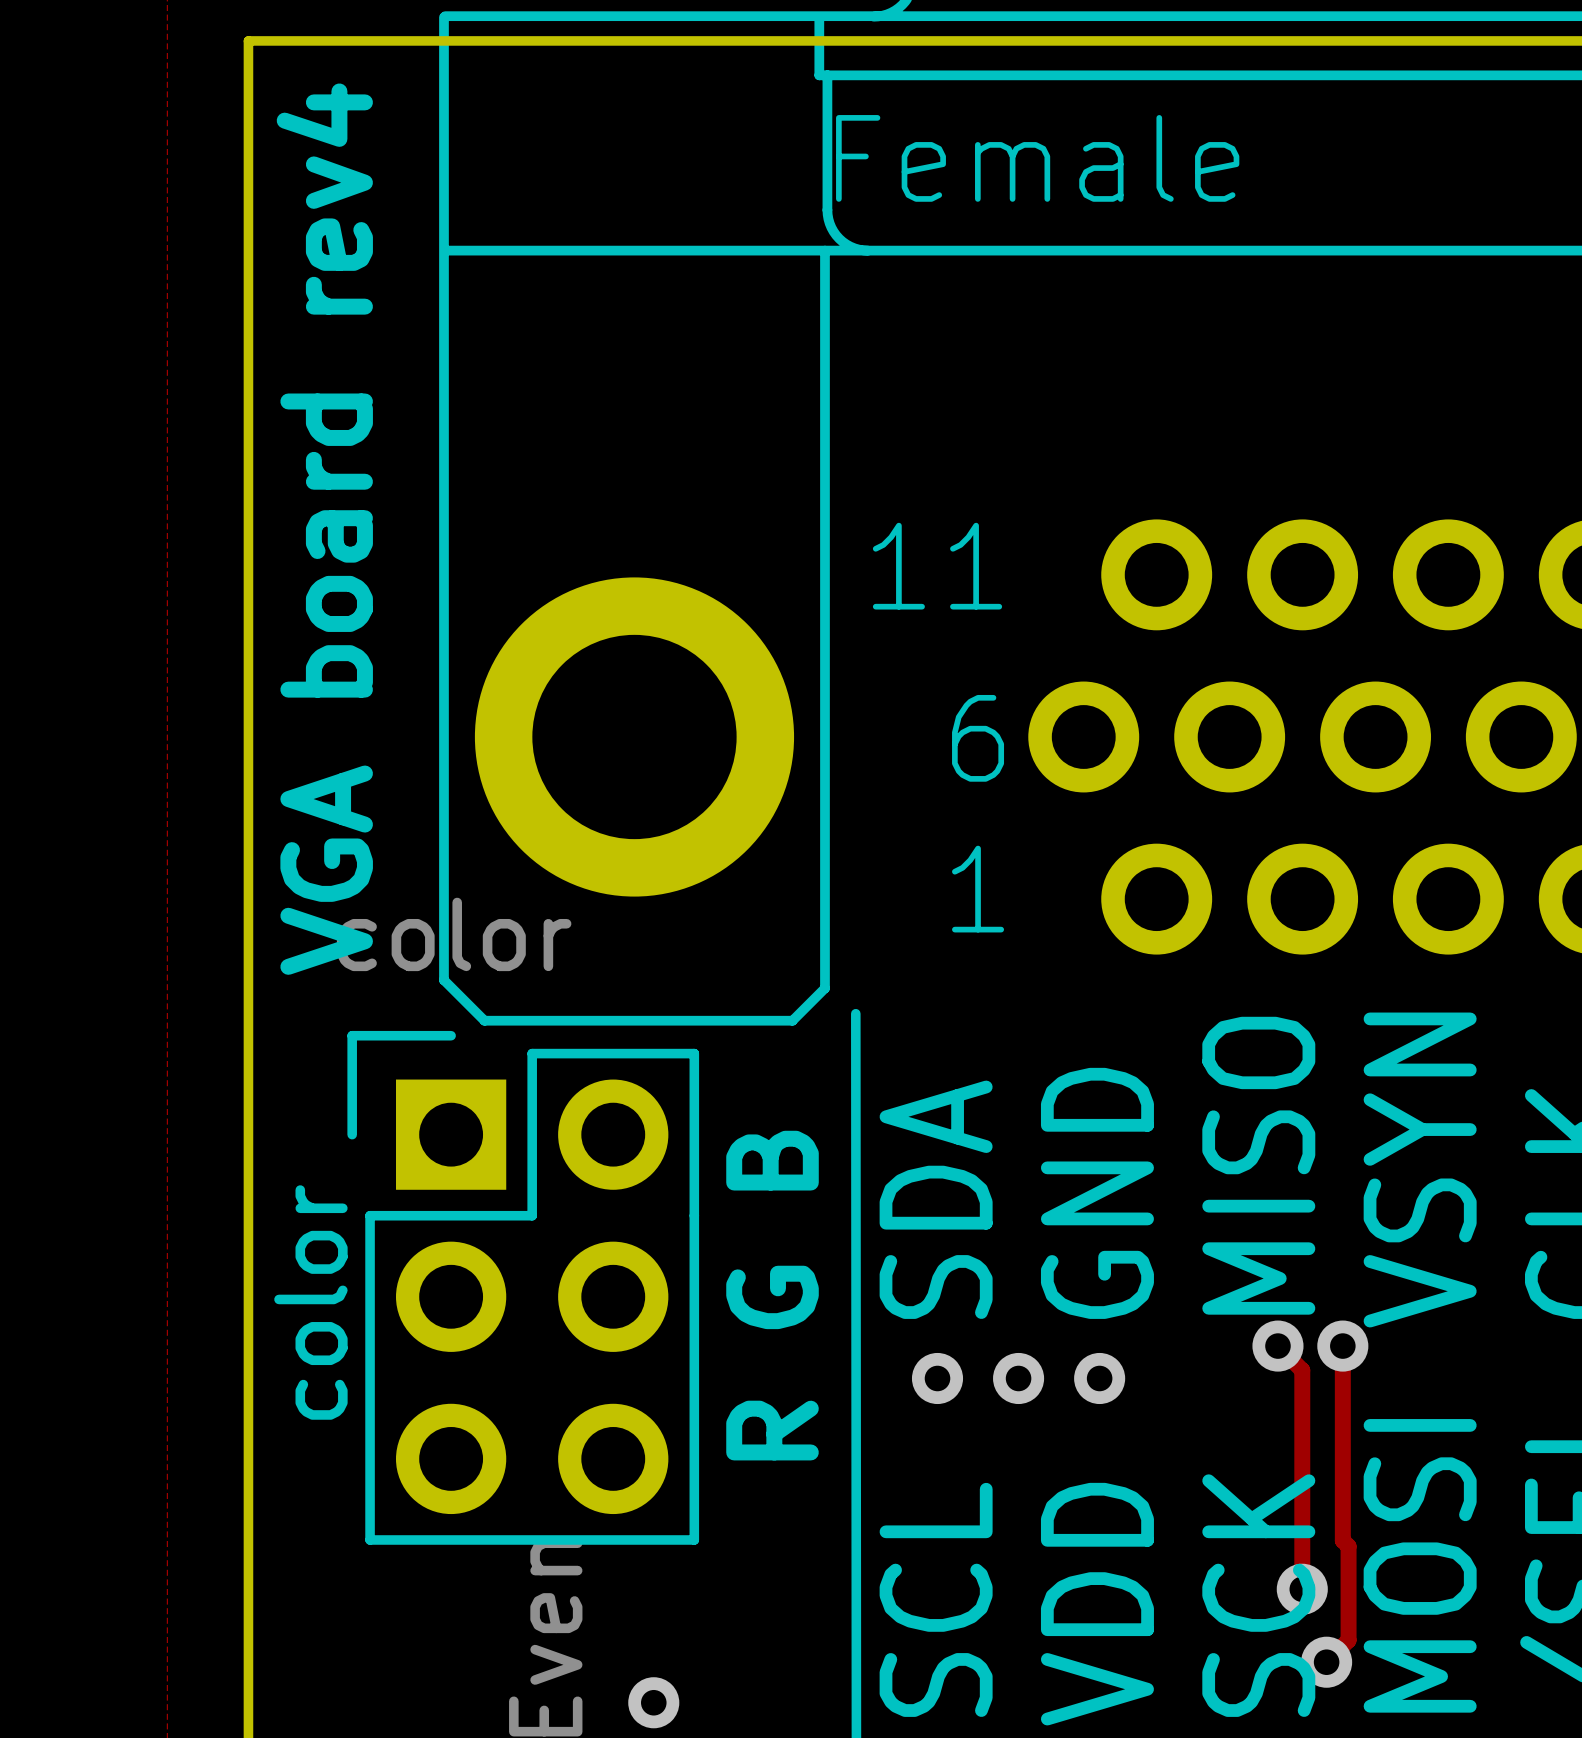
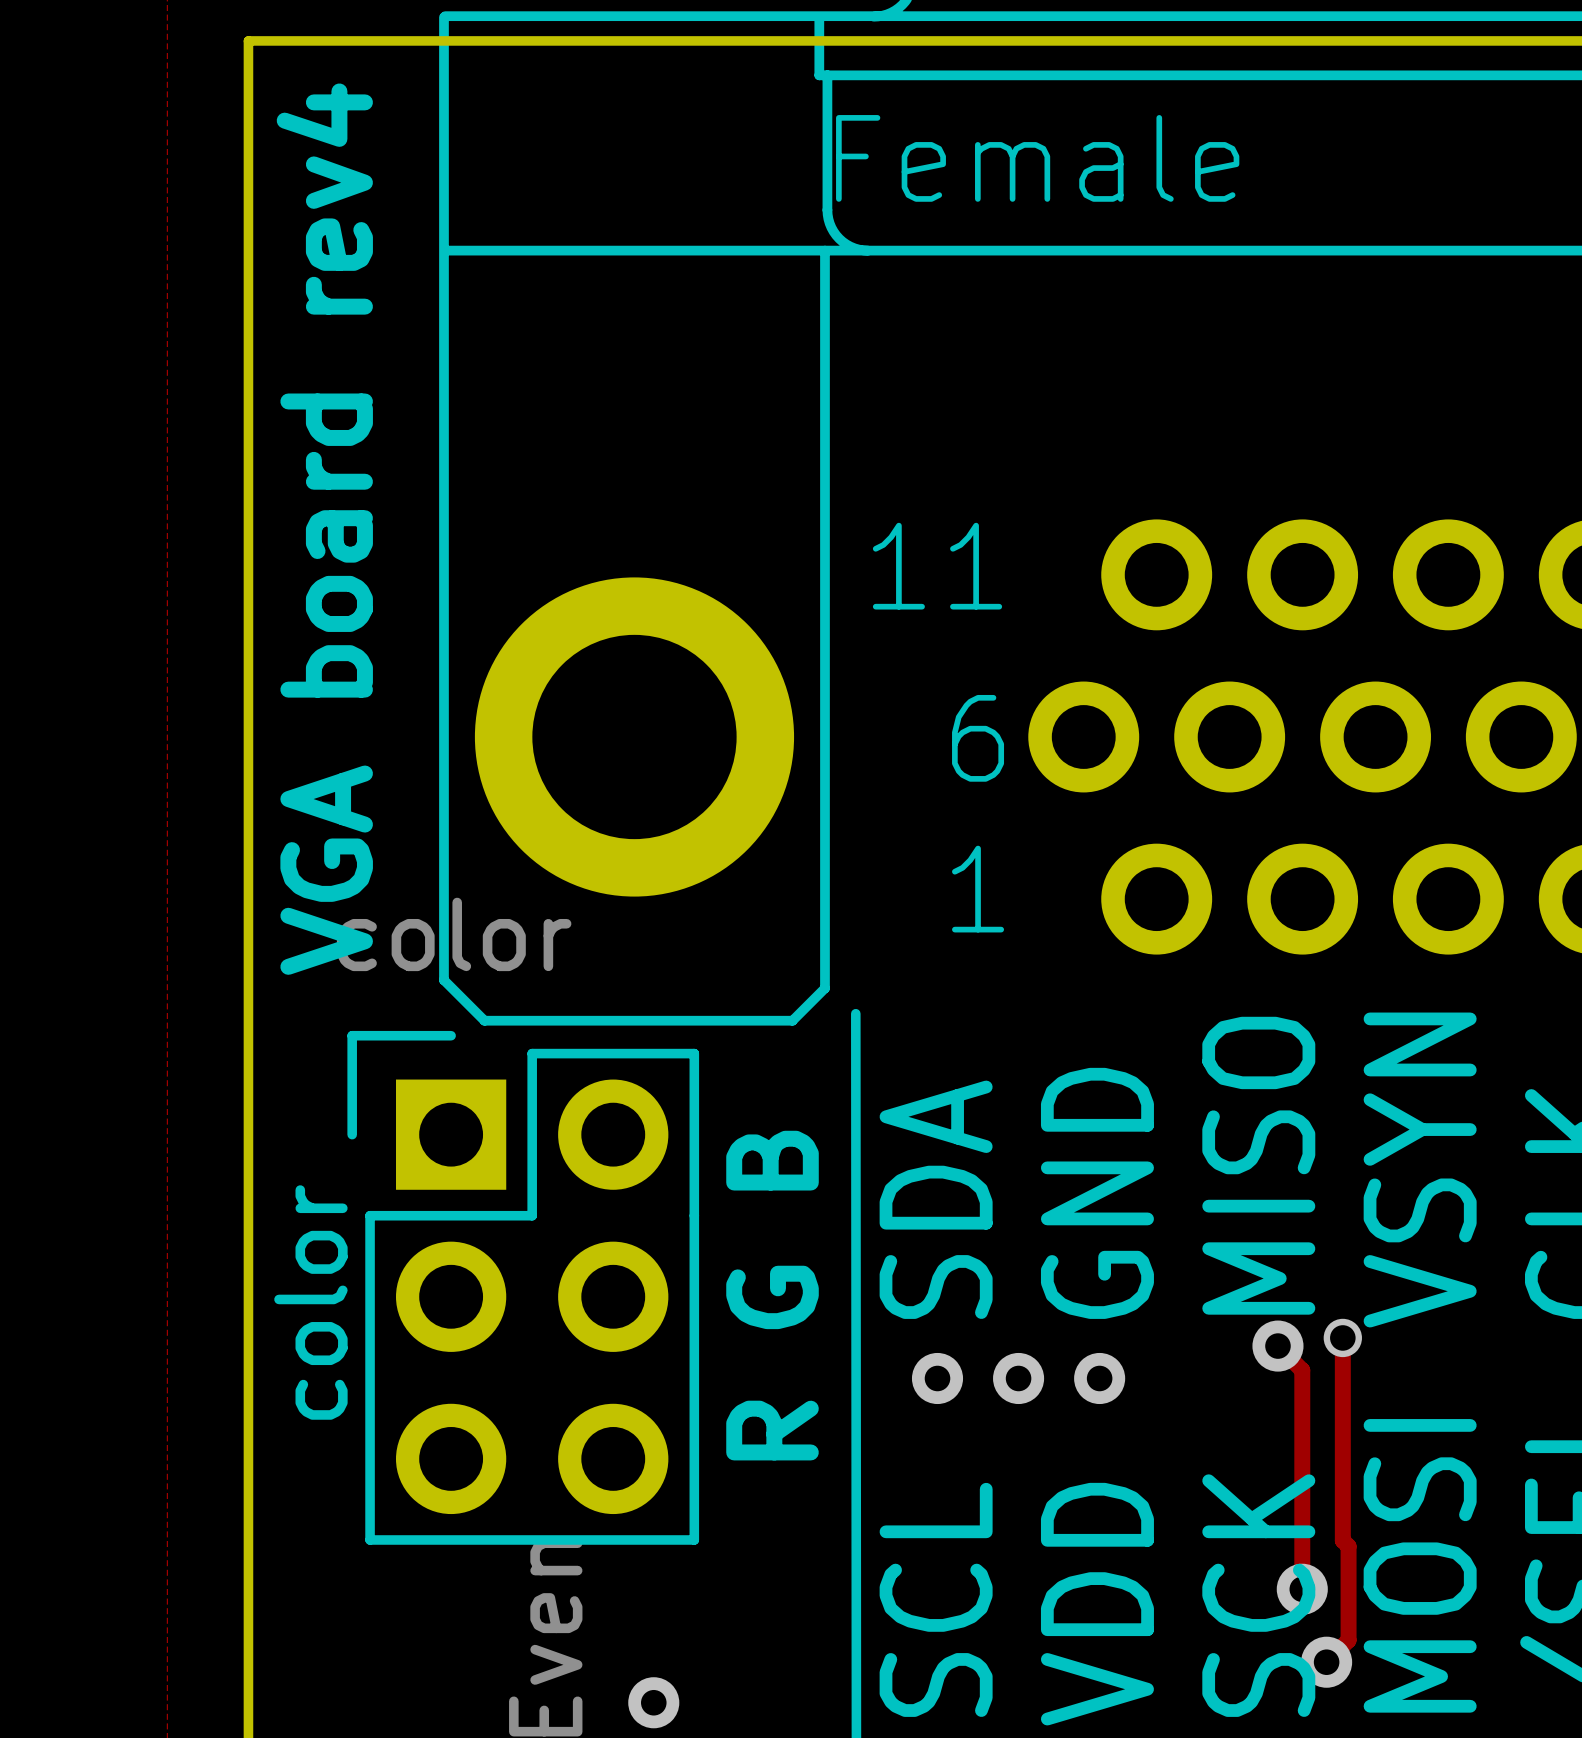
via size: [1317, 1320, 1369, 1372] -> [1323, 1318, 1362, 1358]

